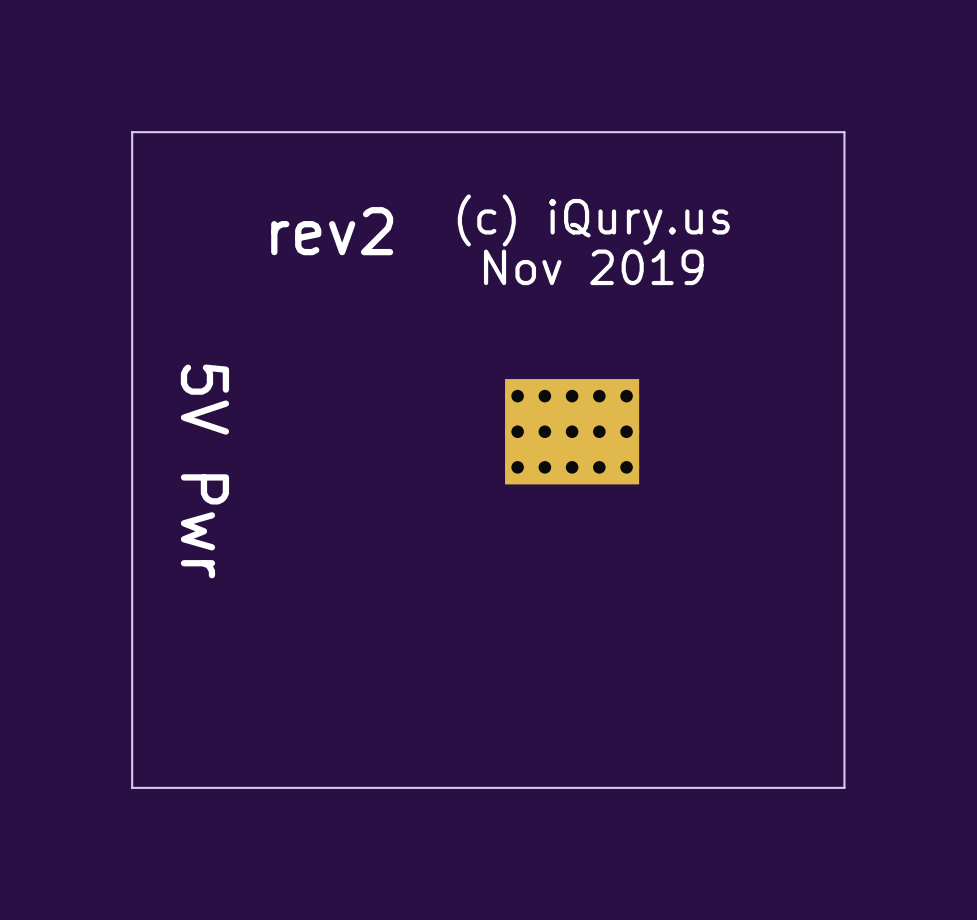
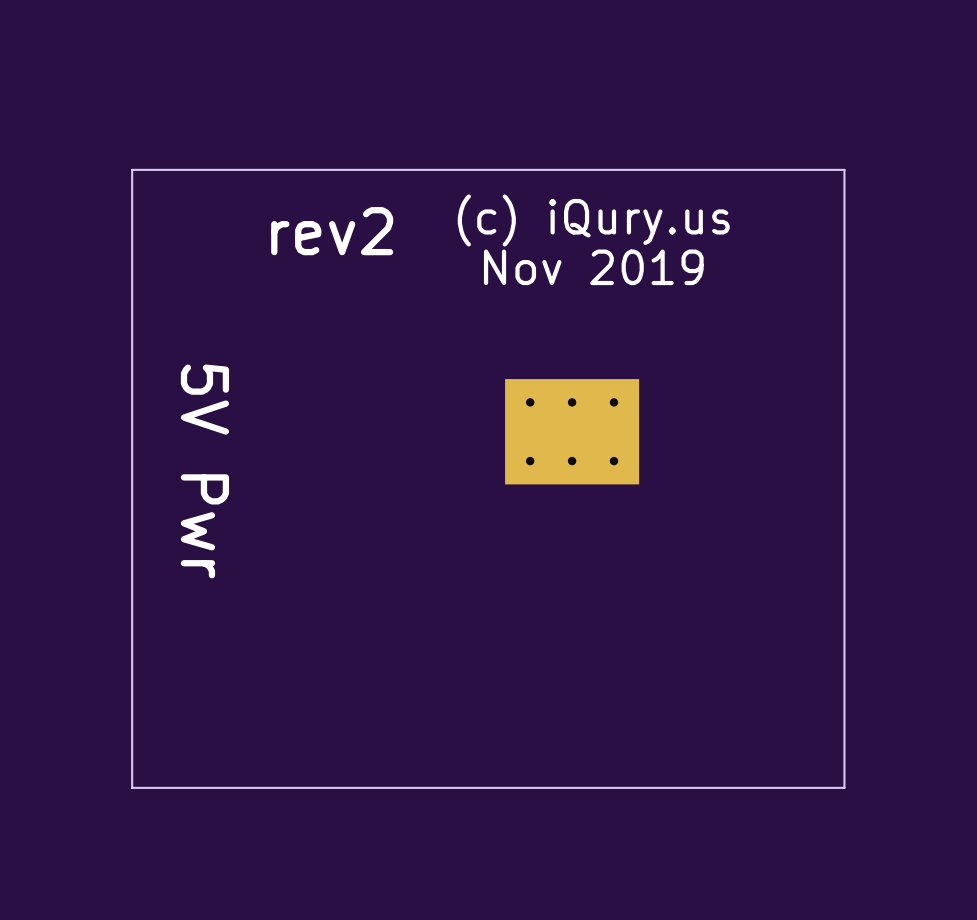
board edge: (844, 169) (844, 132) (132, 132) (132, 169) -> (844, 169) (132, 169)
part footprint: [505, 379, 640, 485] -> [505, 379, 640, 485]

